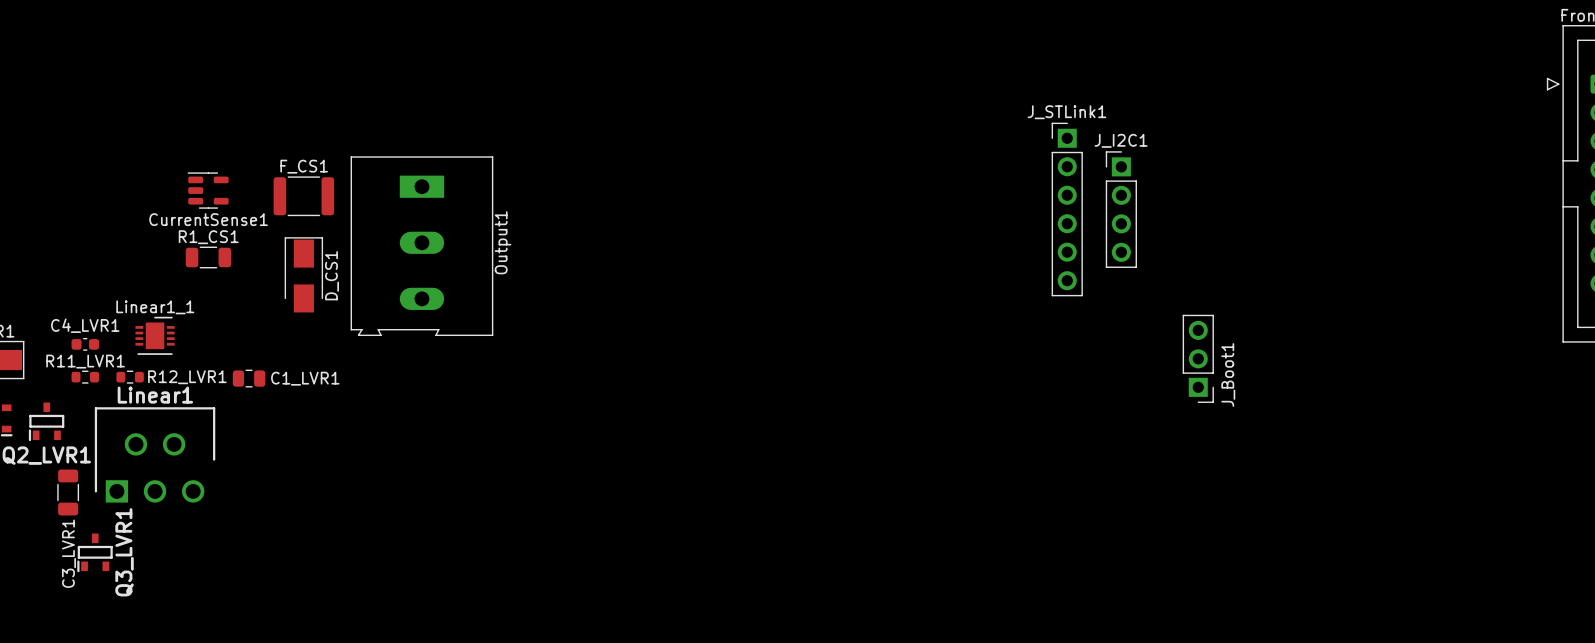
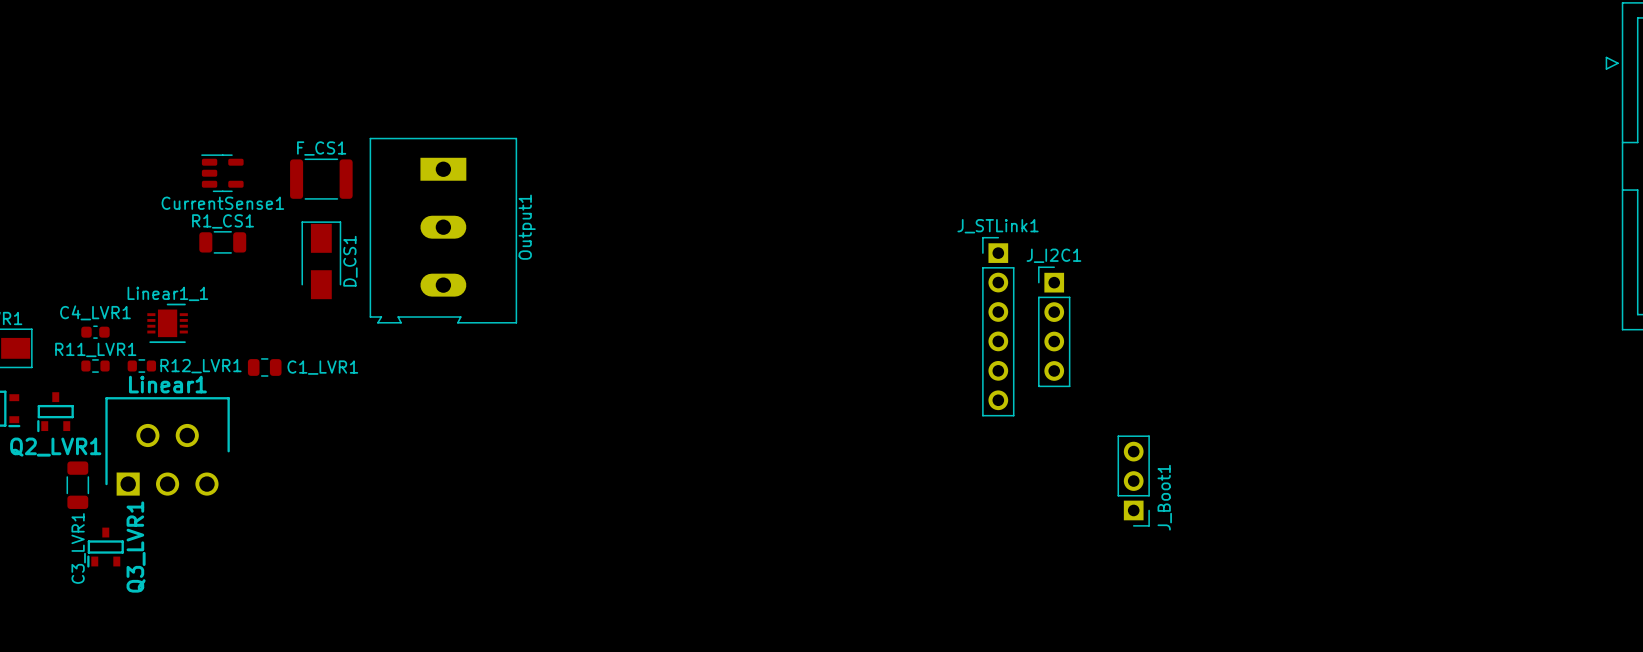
J_STLink1 position: (1067, 209) -> (998, 326)
J_I2C1 position: (1121, 209) -> (1054, 326)
J_Boot1 position: (1198, 358) -> (1133, 481)

